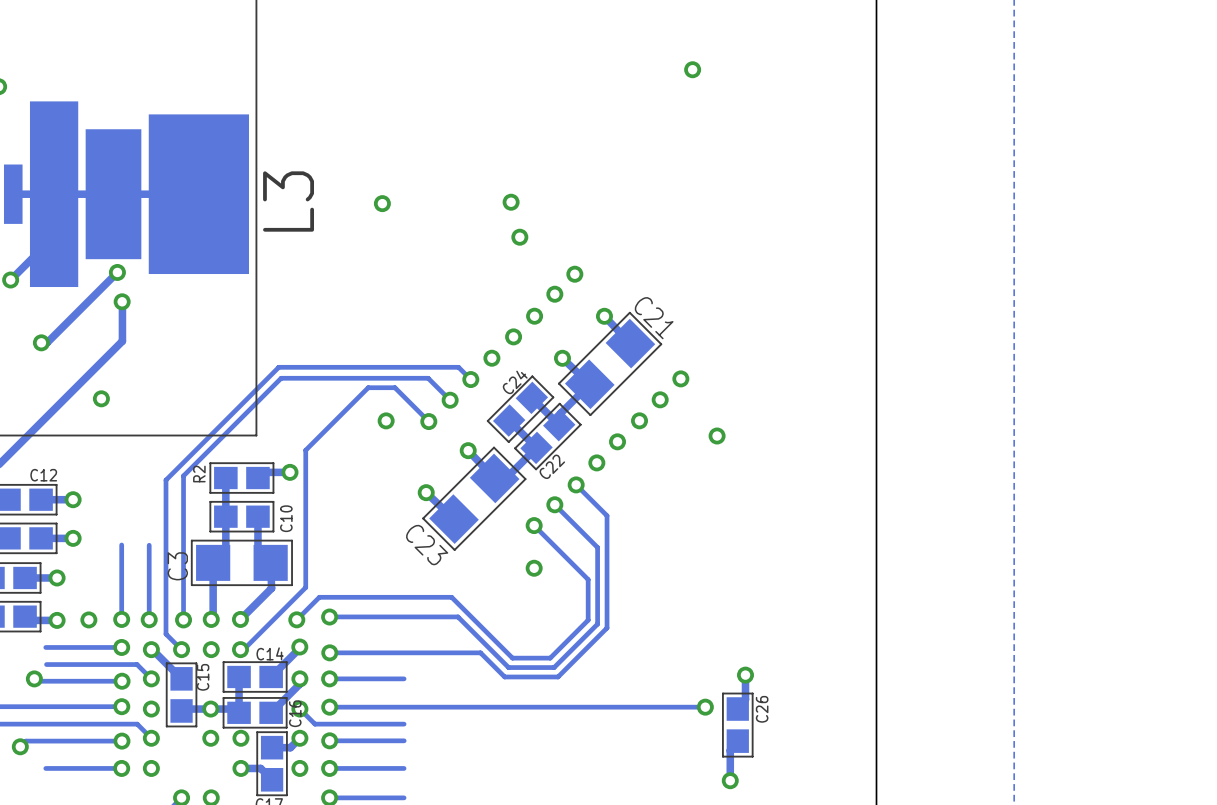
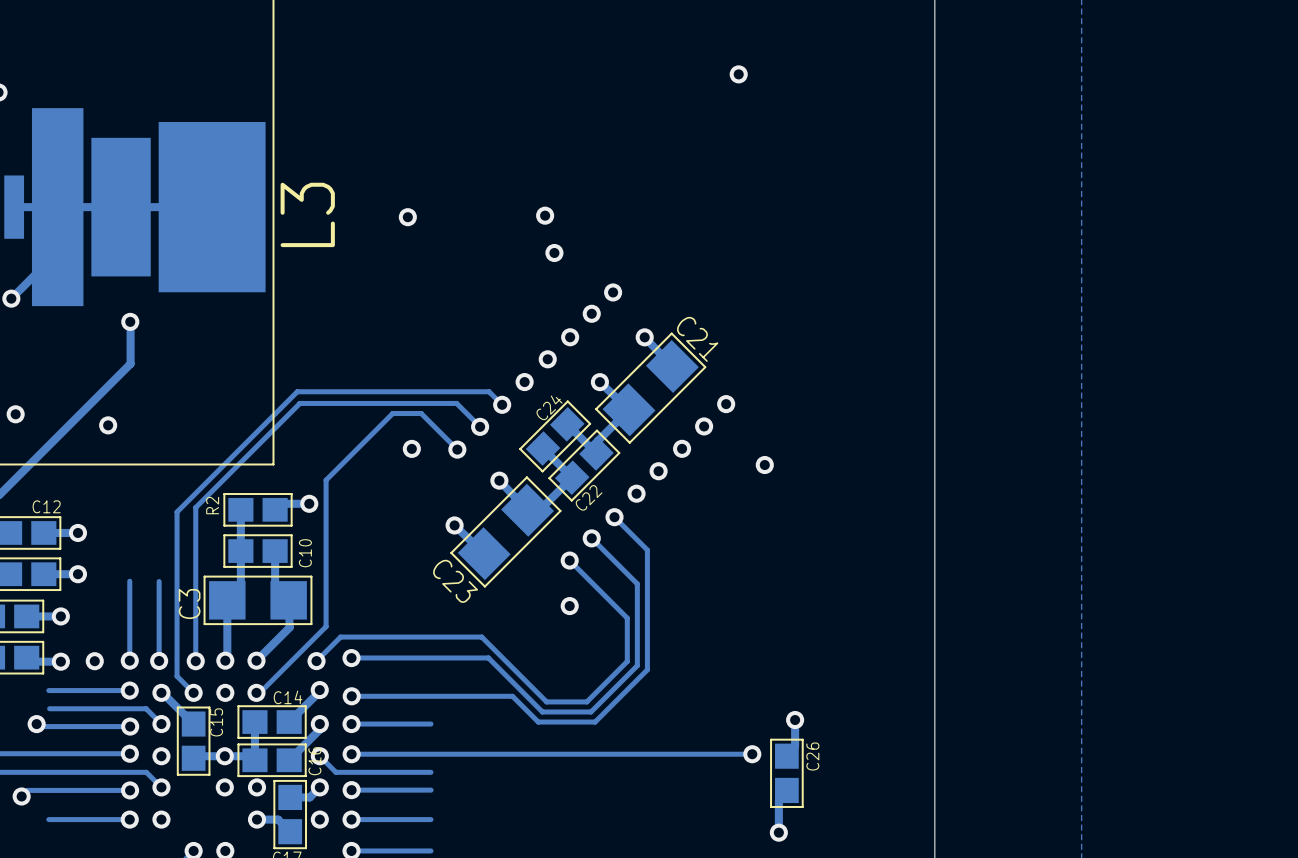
track: (117, 272) (47, 342) (41, 342) -> none
via: (117, 272) -> none
via position: (41, 342) -> (15, 414)

